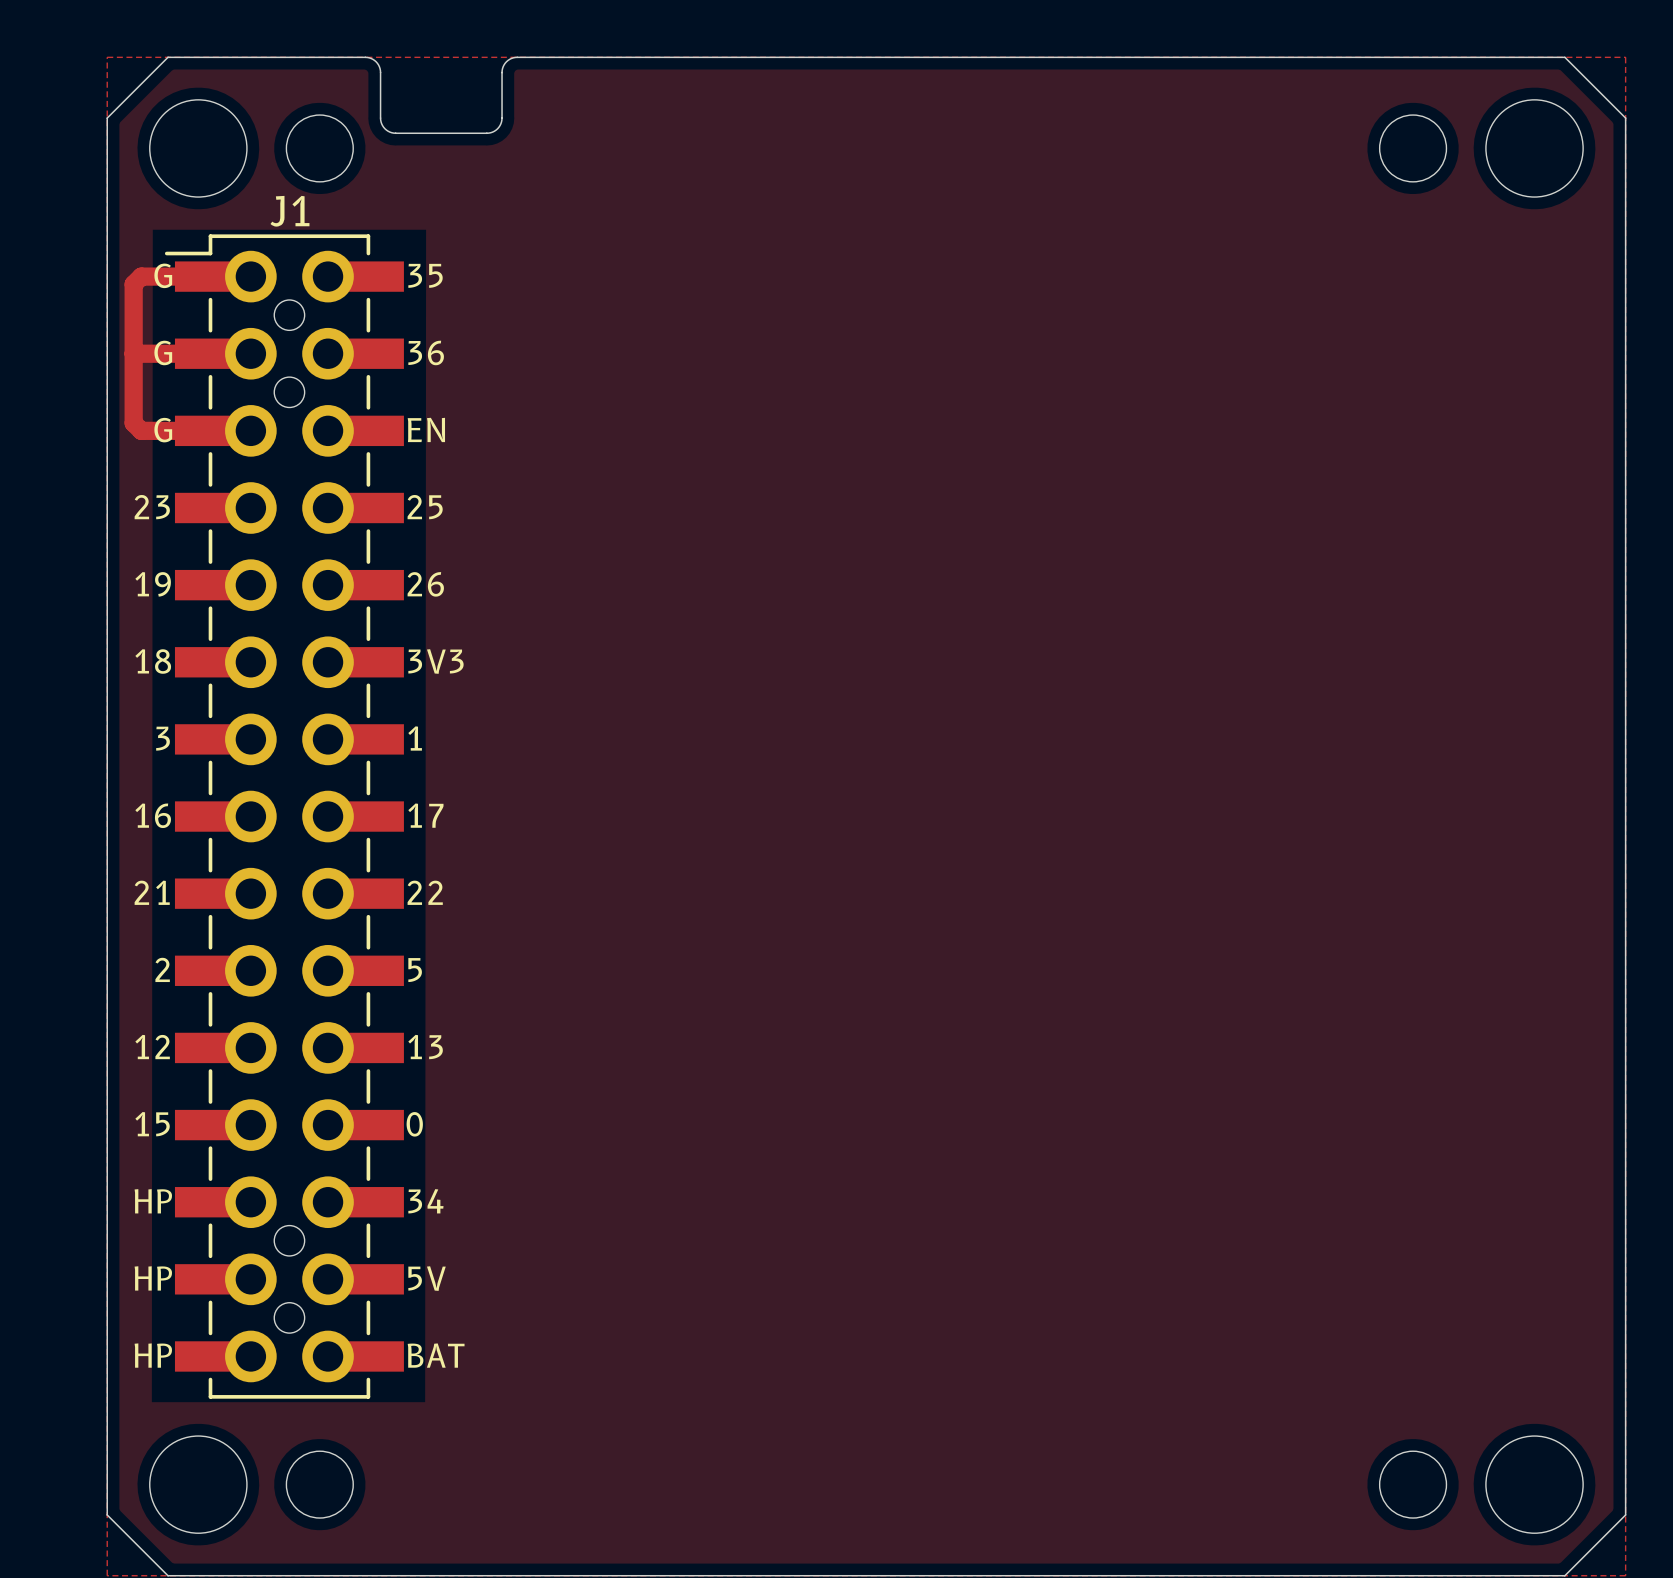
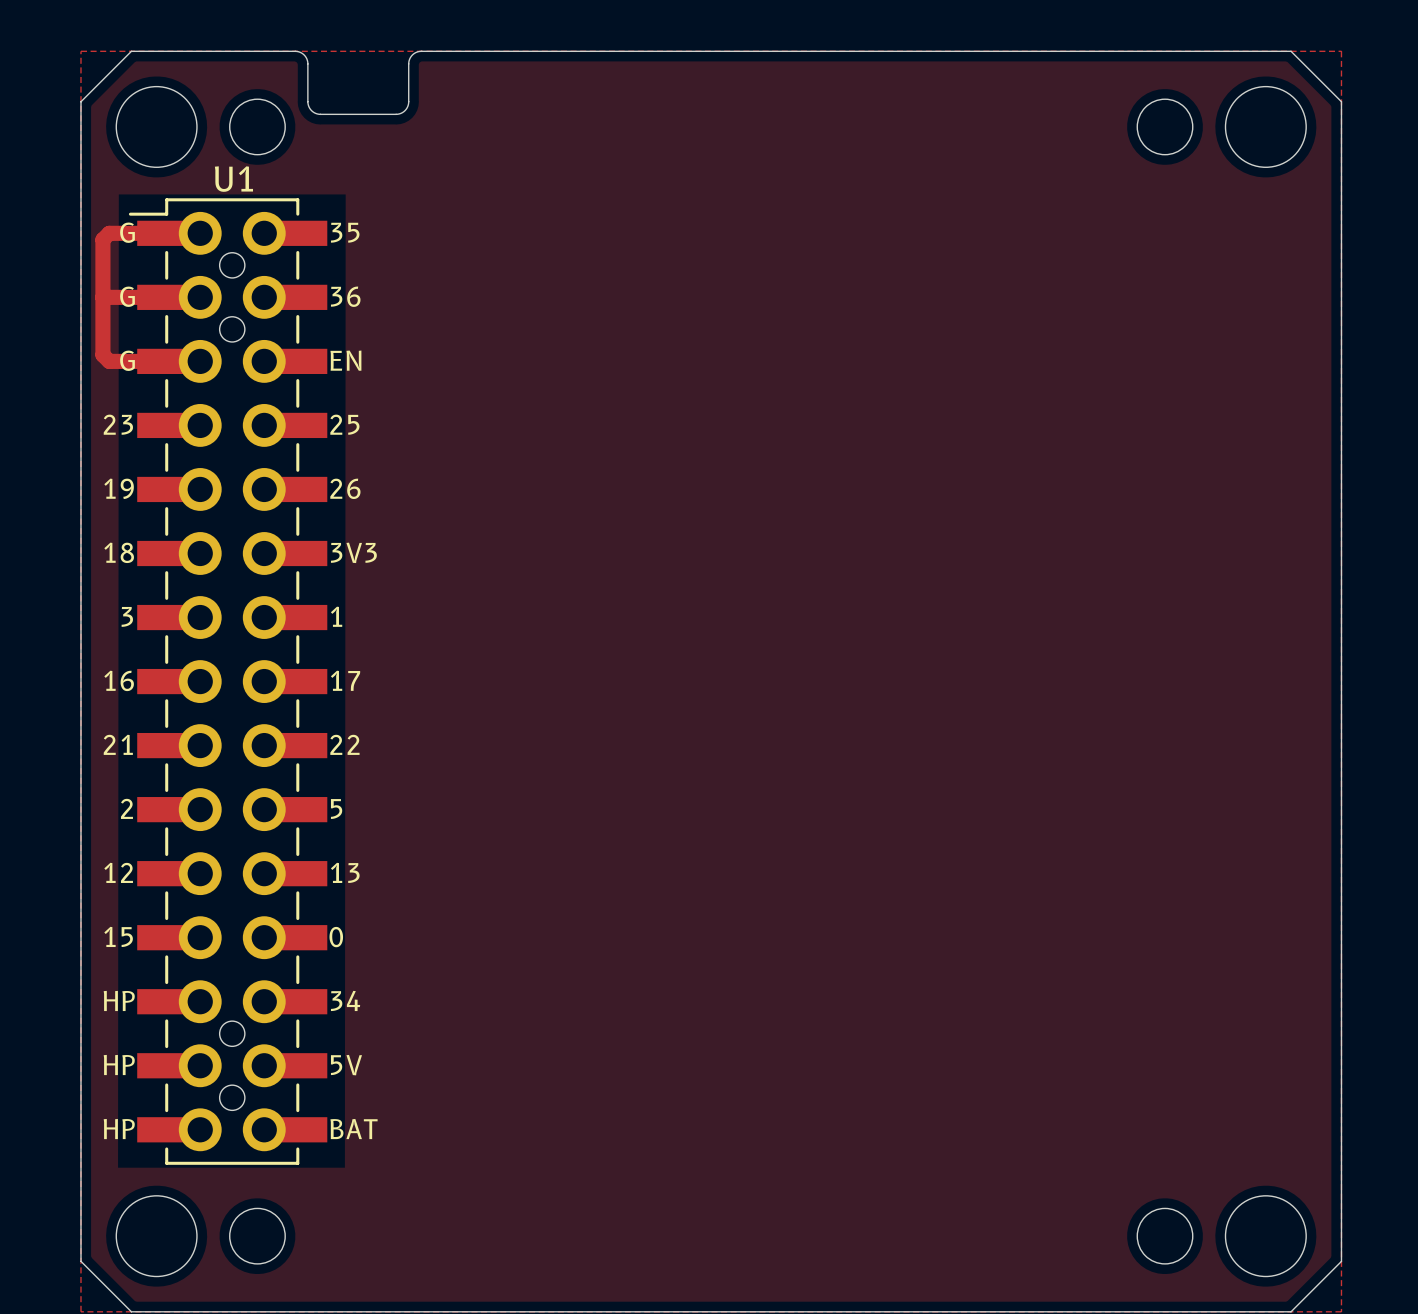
J1 name: J1 (289, 211) -> U1 (233, 179)

